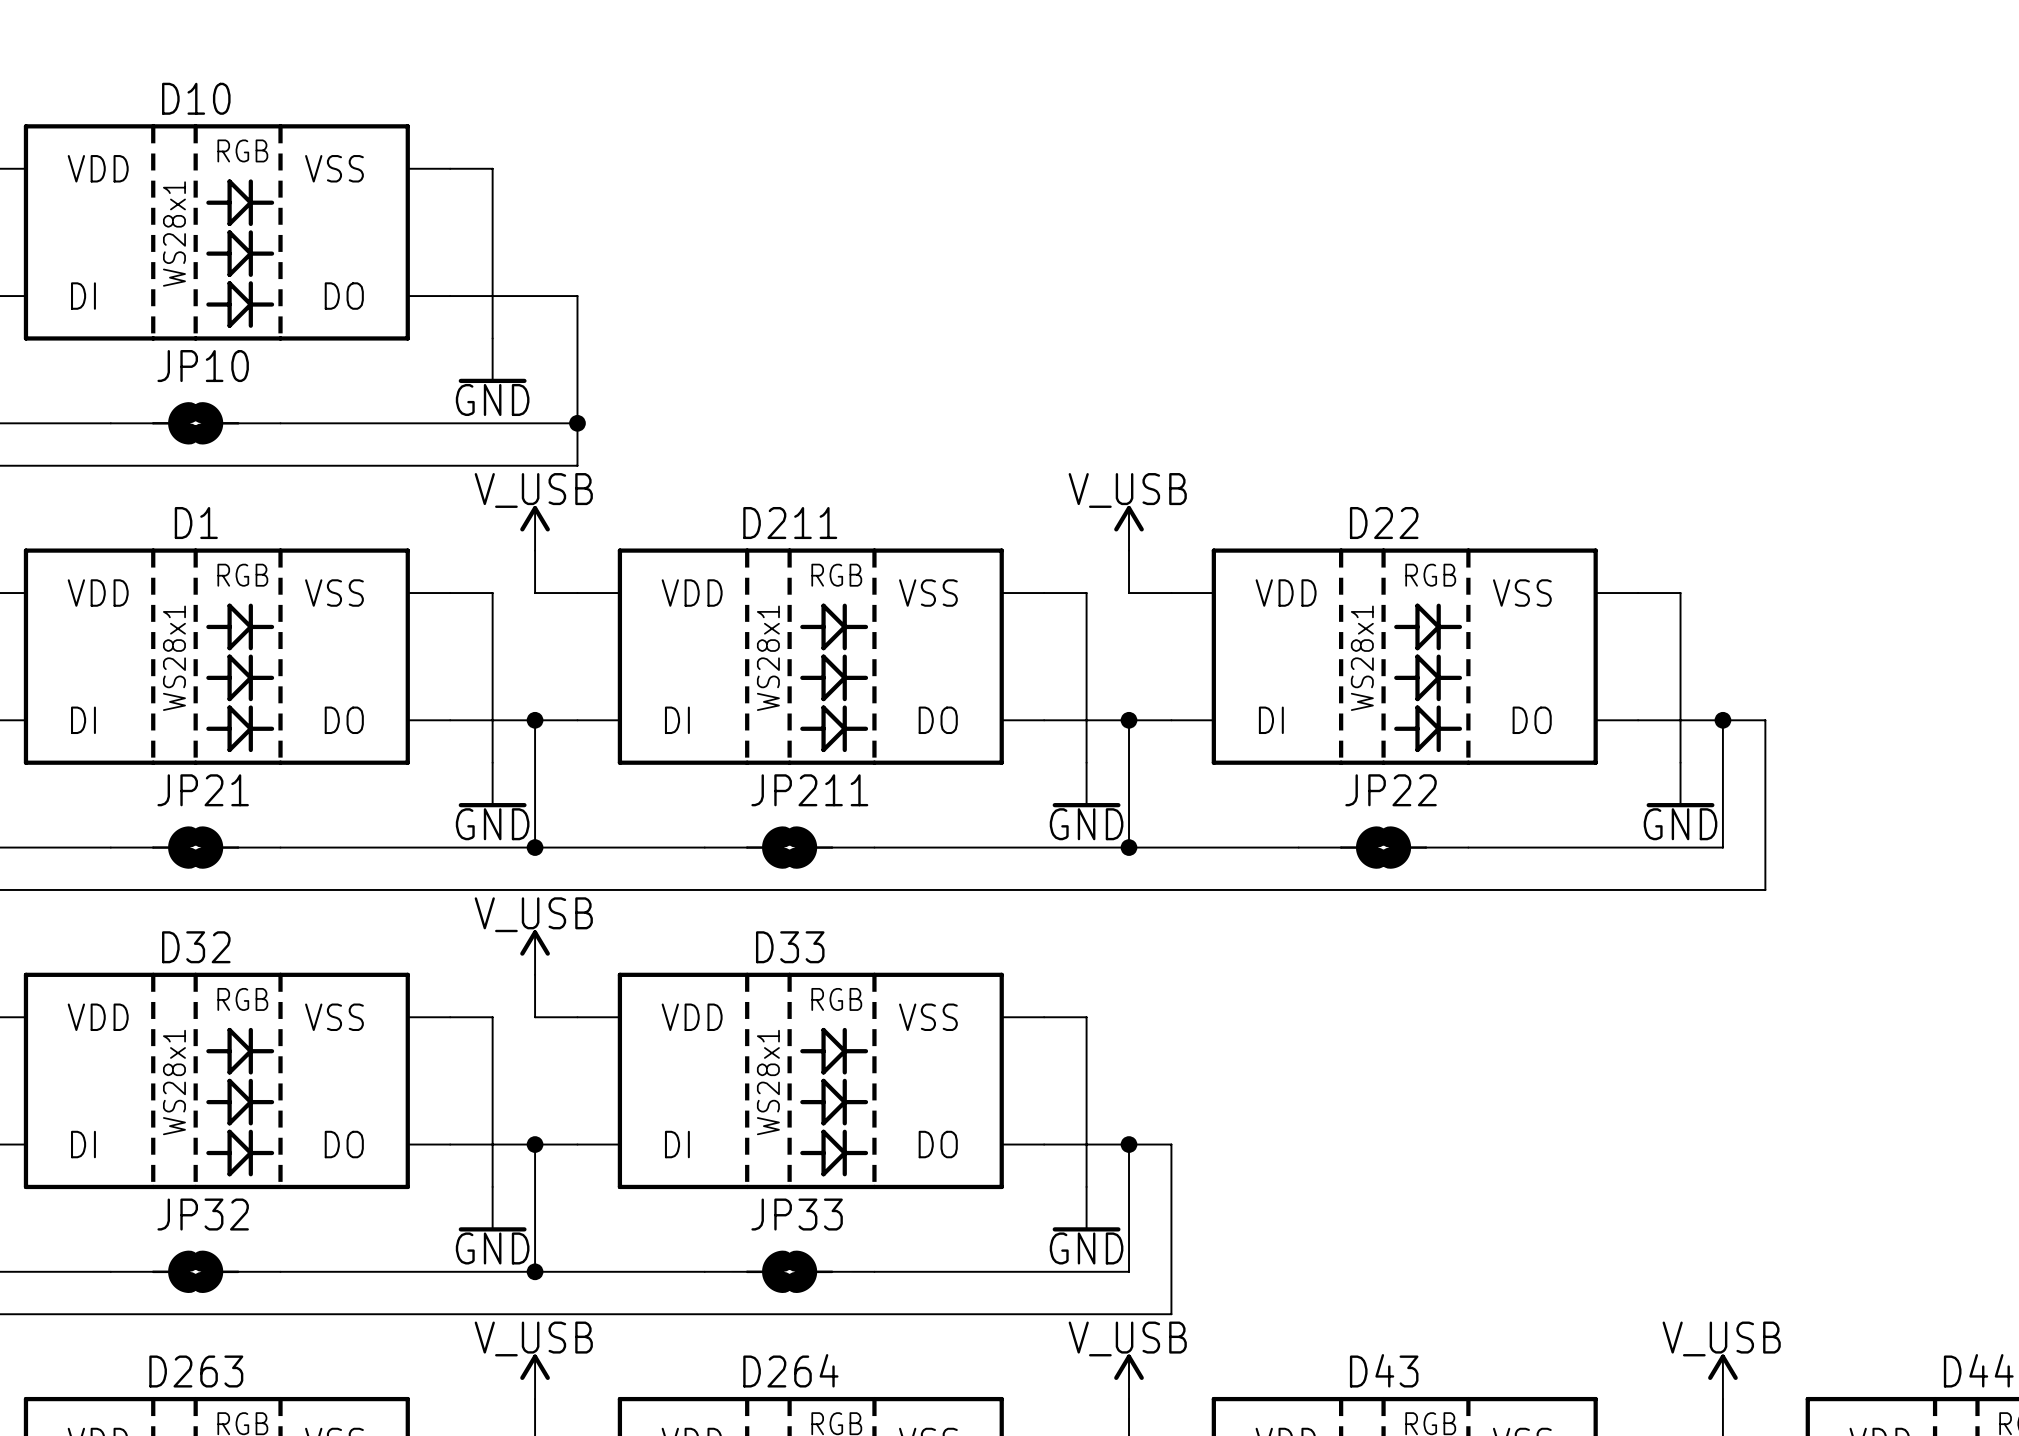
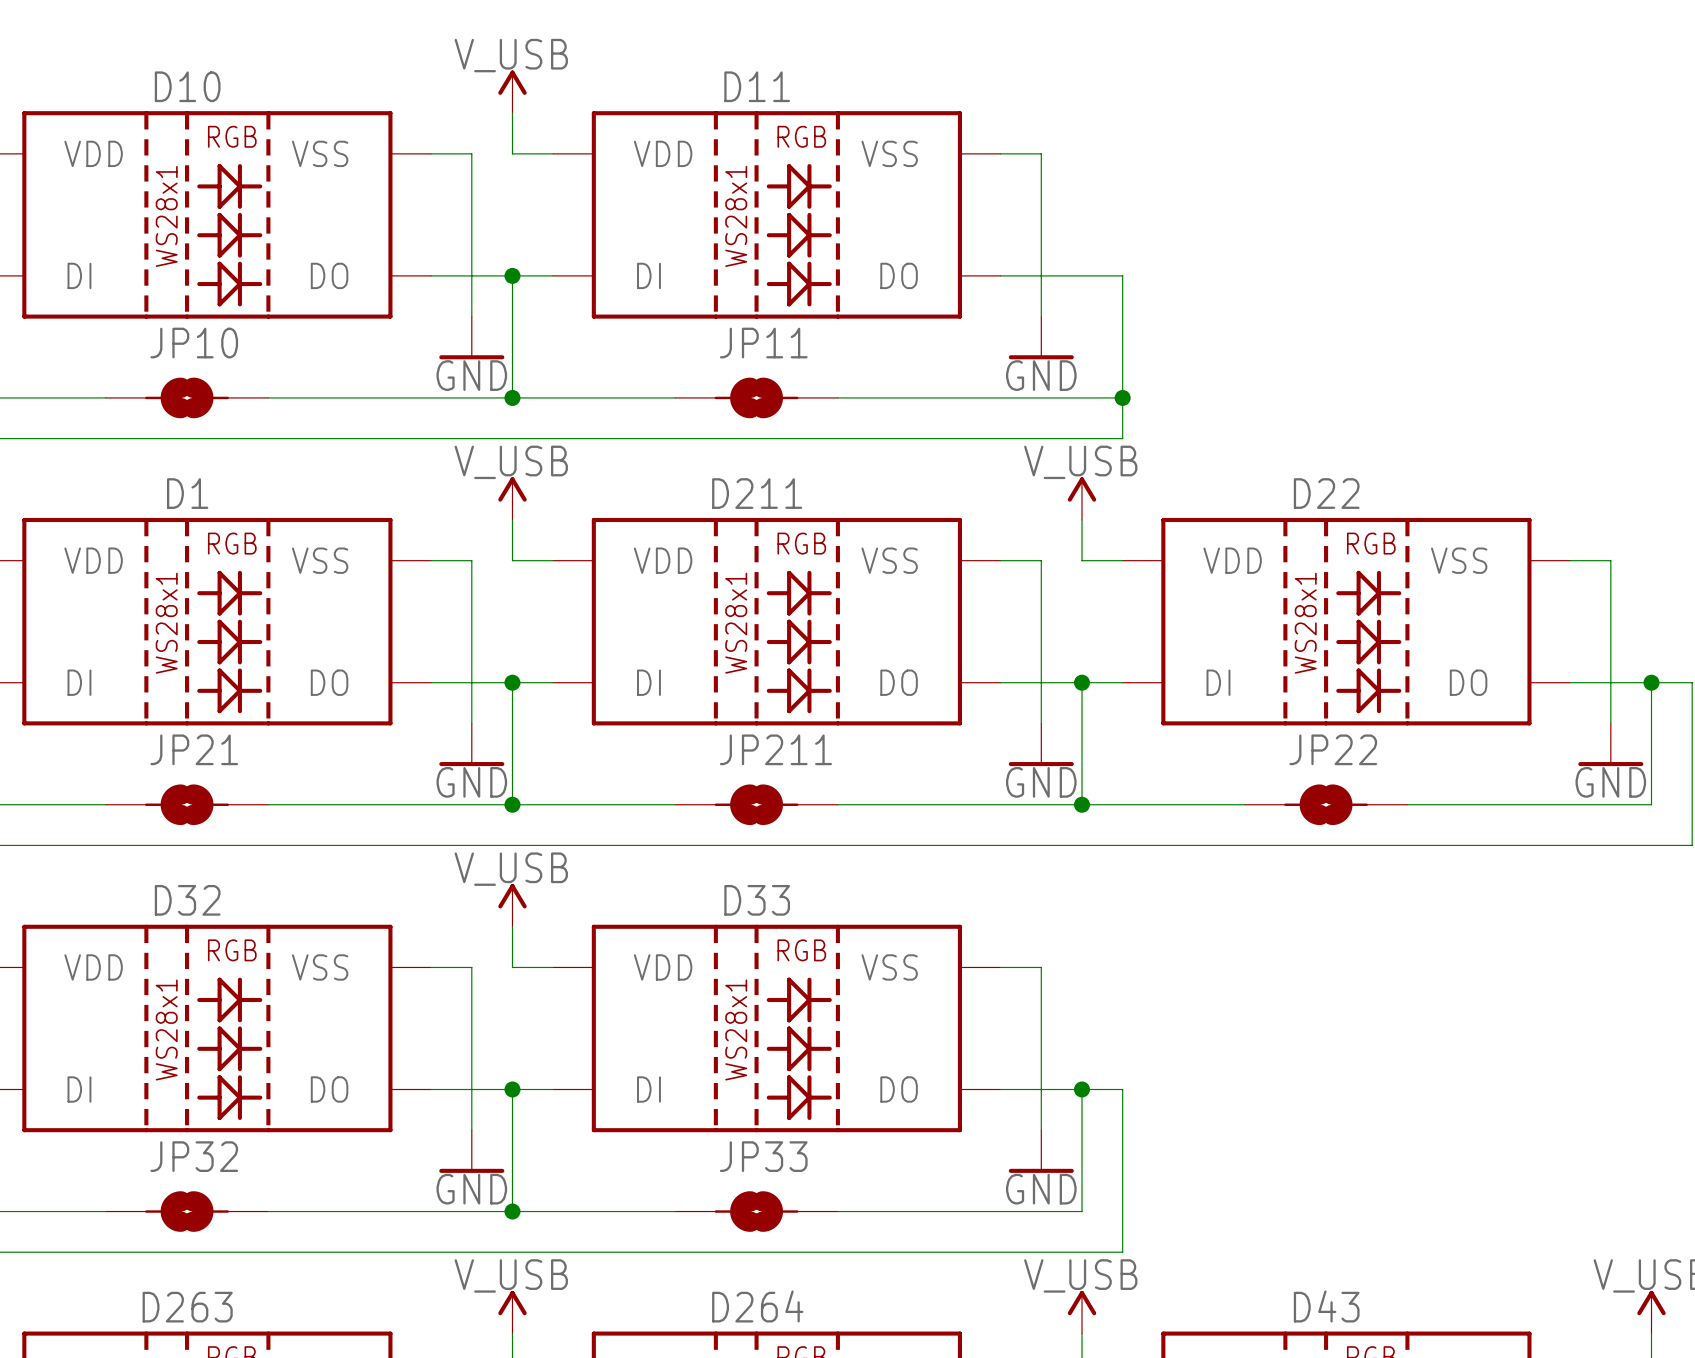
power symbol: none -> V_USB (512, 91)
wire: none -> (512, 113) (512, 153) (553, 153)
wire: none -> (1000, 153) (1041, 153) (1041, 316)
D11: none -> (776, 214)
wire: none -> (512, 275) (512, 397)
junction: none -> (512, 275)
wire: (577, 296) (577, 465) -> (1000, 275) (1122, 275) (1122, 438) (553, 438)
power symbol: none -> GND (1041, 337)
wire: none -> (553, 397) (675, 397)
junction position: (577, 423) -> (512, 397)
JP11: none -> (756, 397)
wire: none -> (837, 397) (1122, 397)
junction: none -> (1122, 397)

